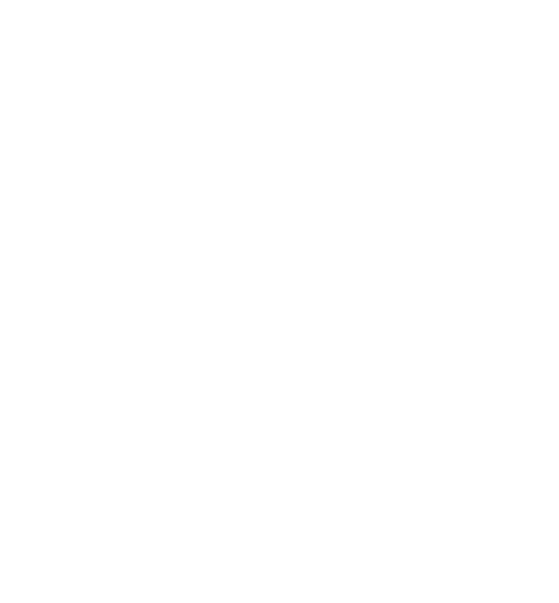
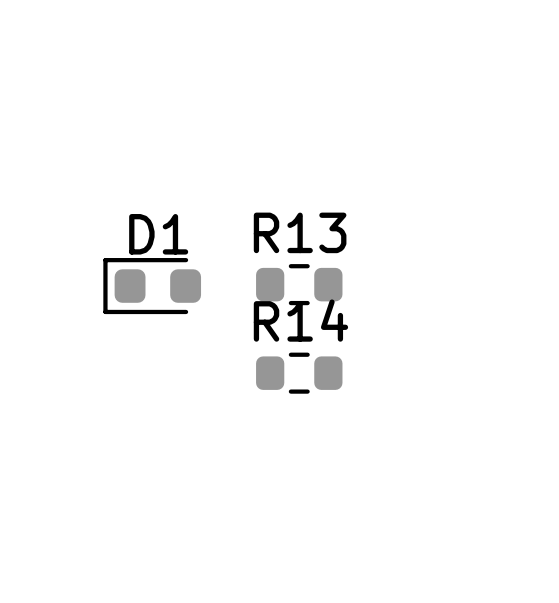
R13: none -> (299, 284)
D1: none -> (152, 286)
R14: none -> (299, 373)

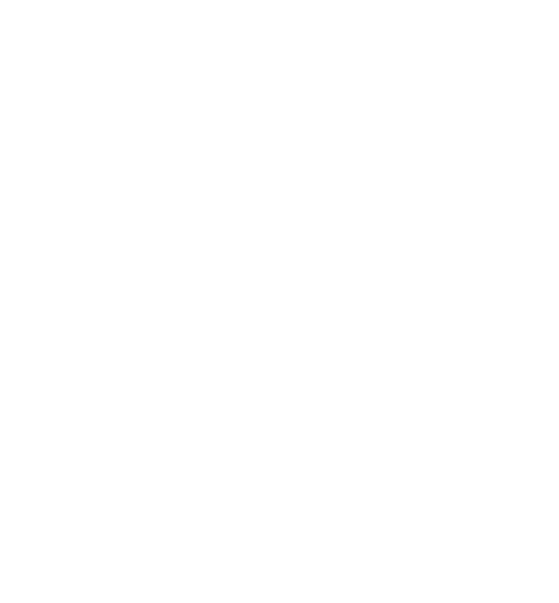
R13: (299, 284) -> none
D1: (152, 286) -> none
R14: (299, 373) -> none

